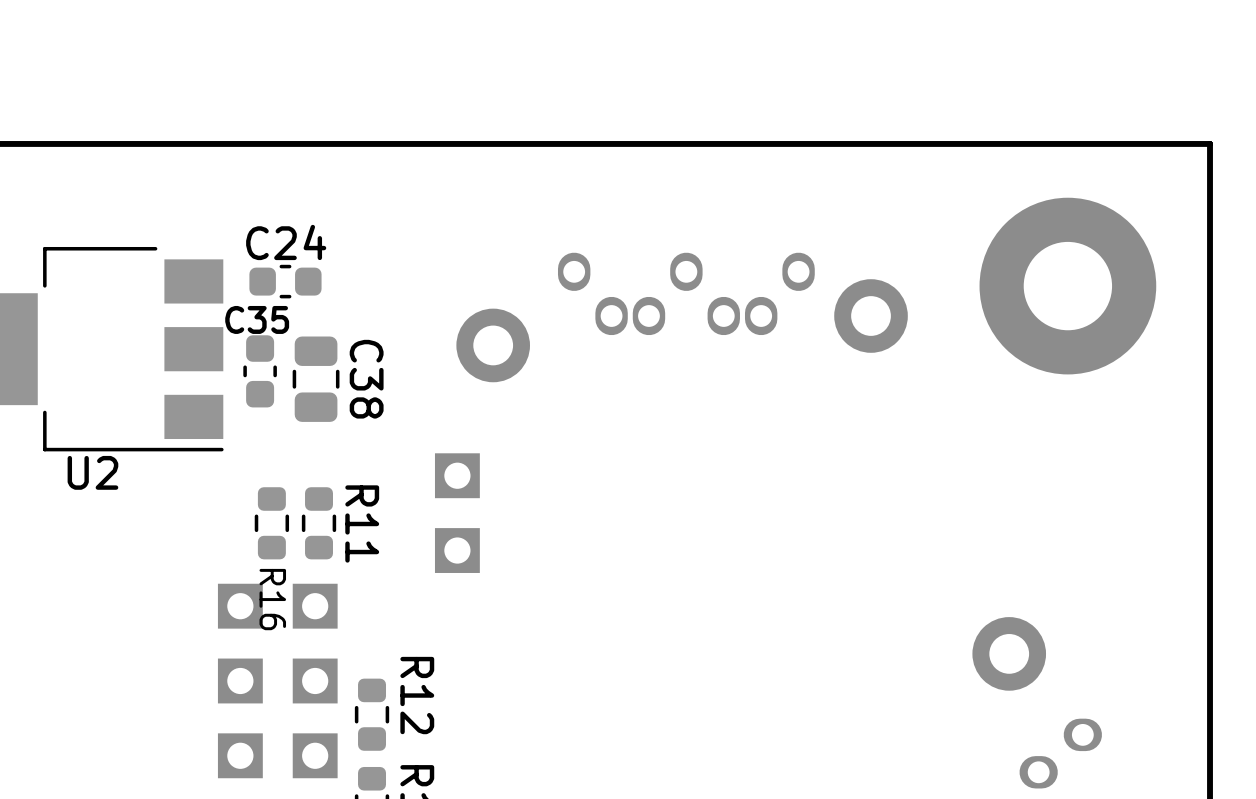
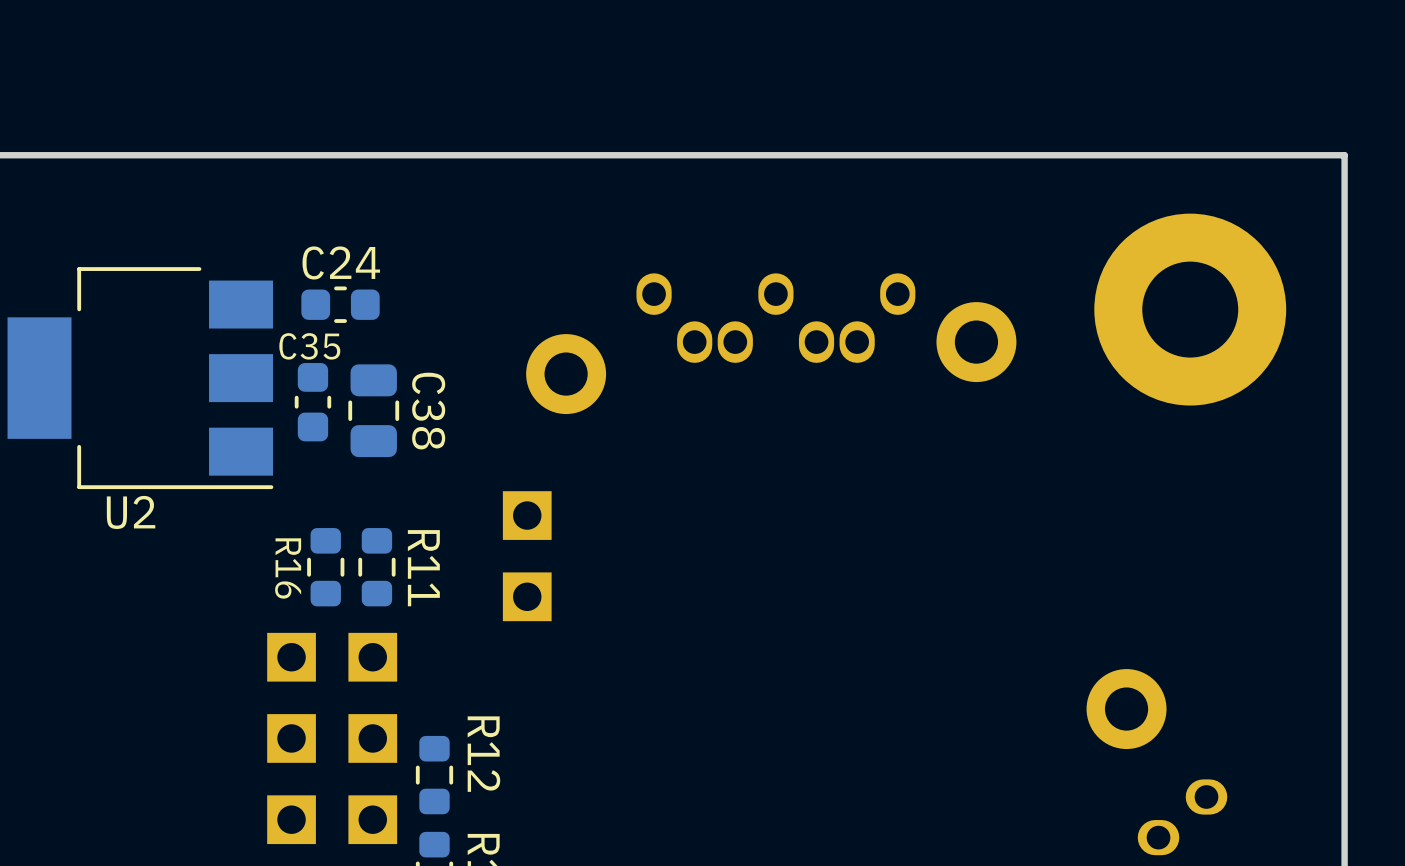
R16 name position: R16 (272, 599) -> R16 (288, 568)

